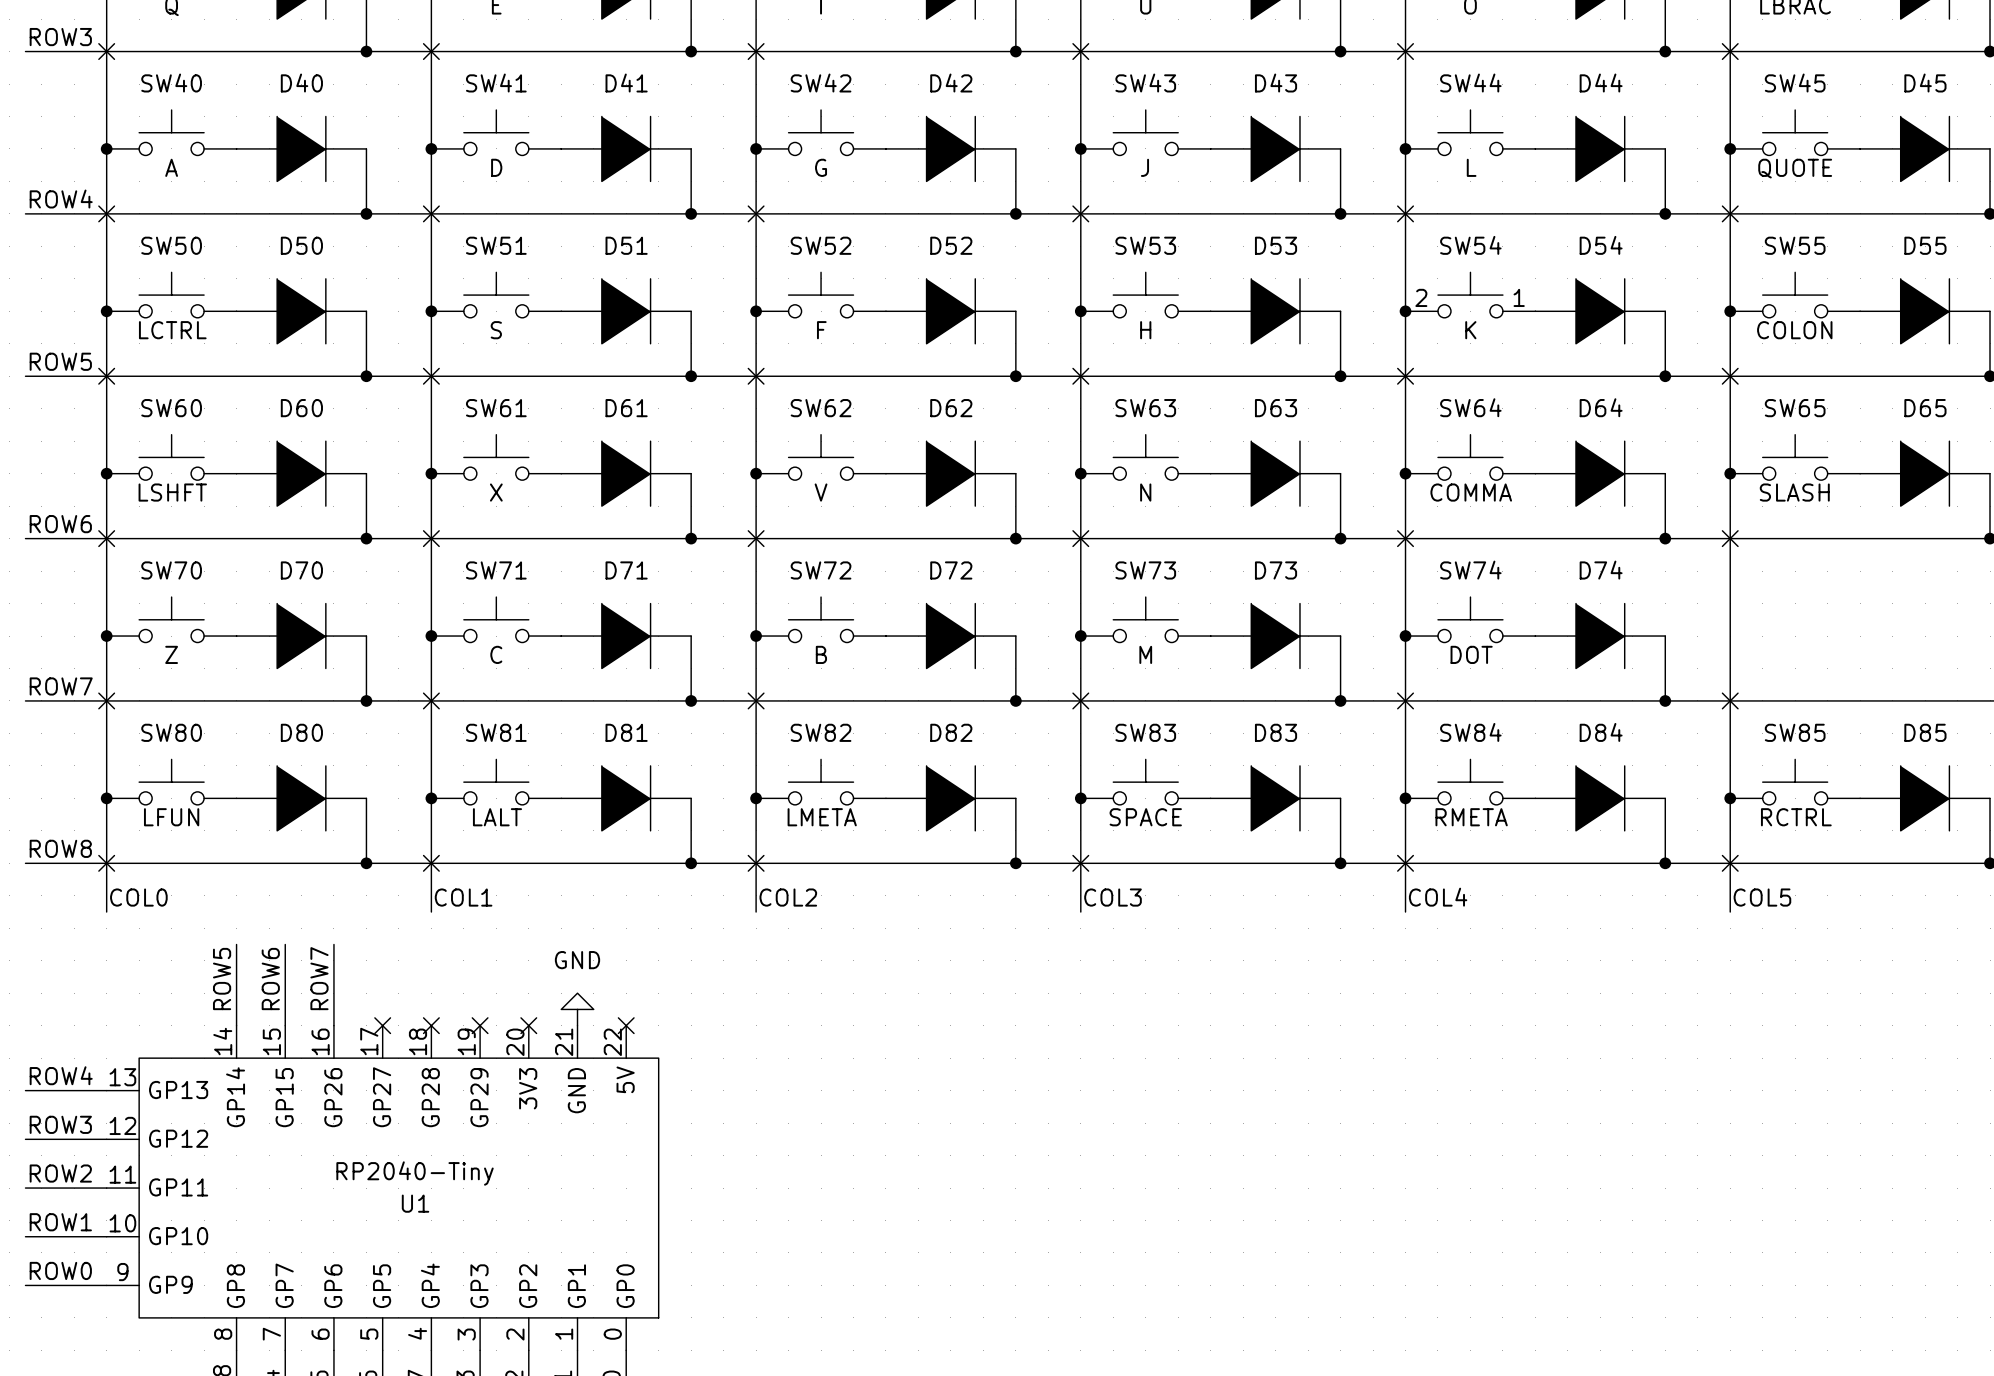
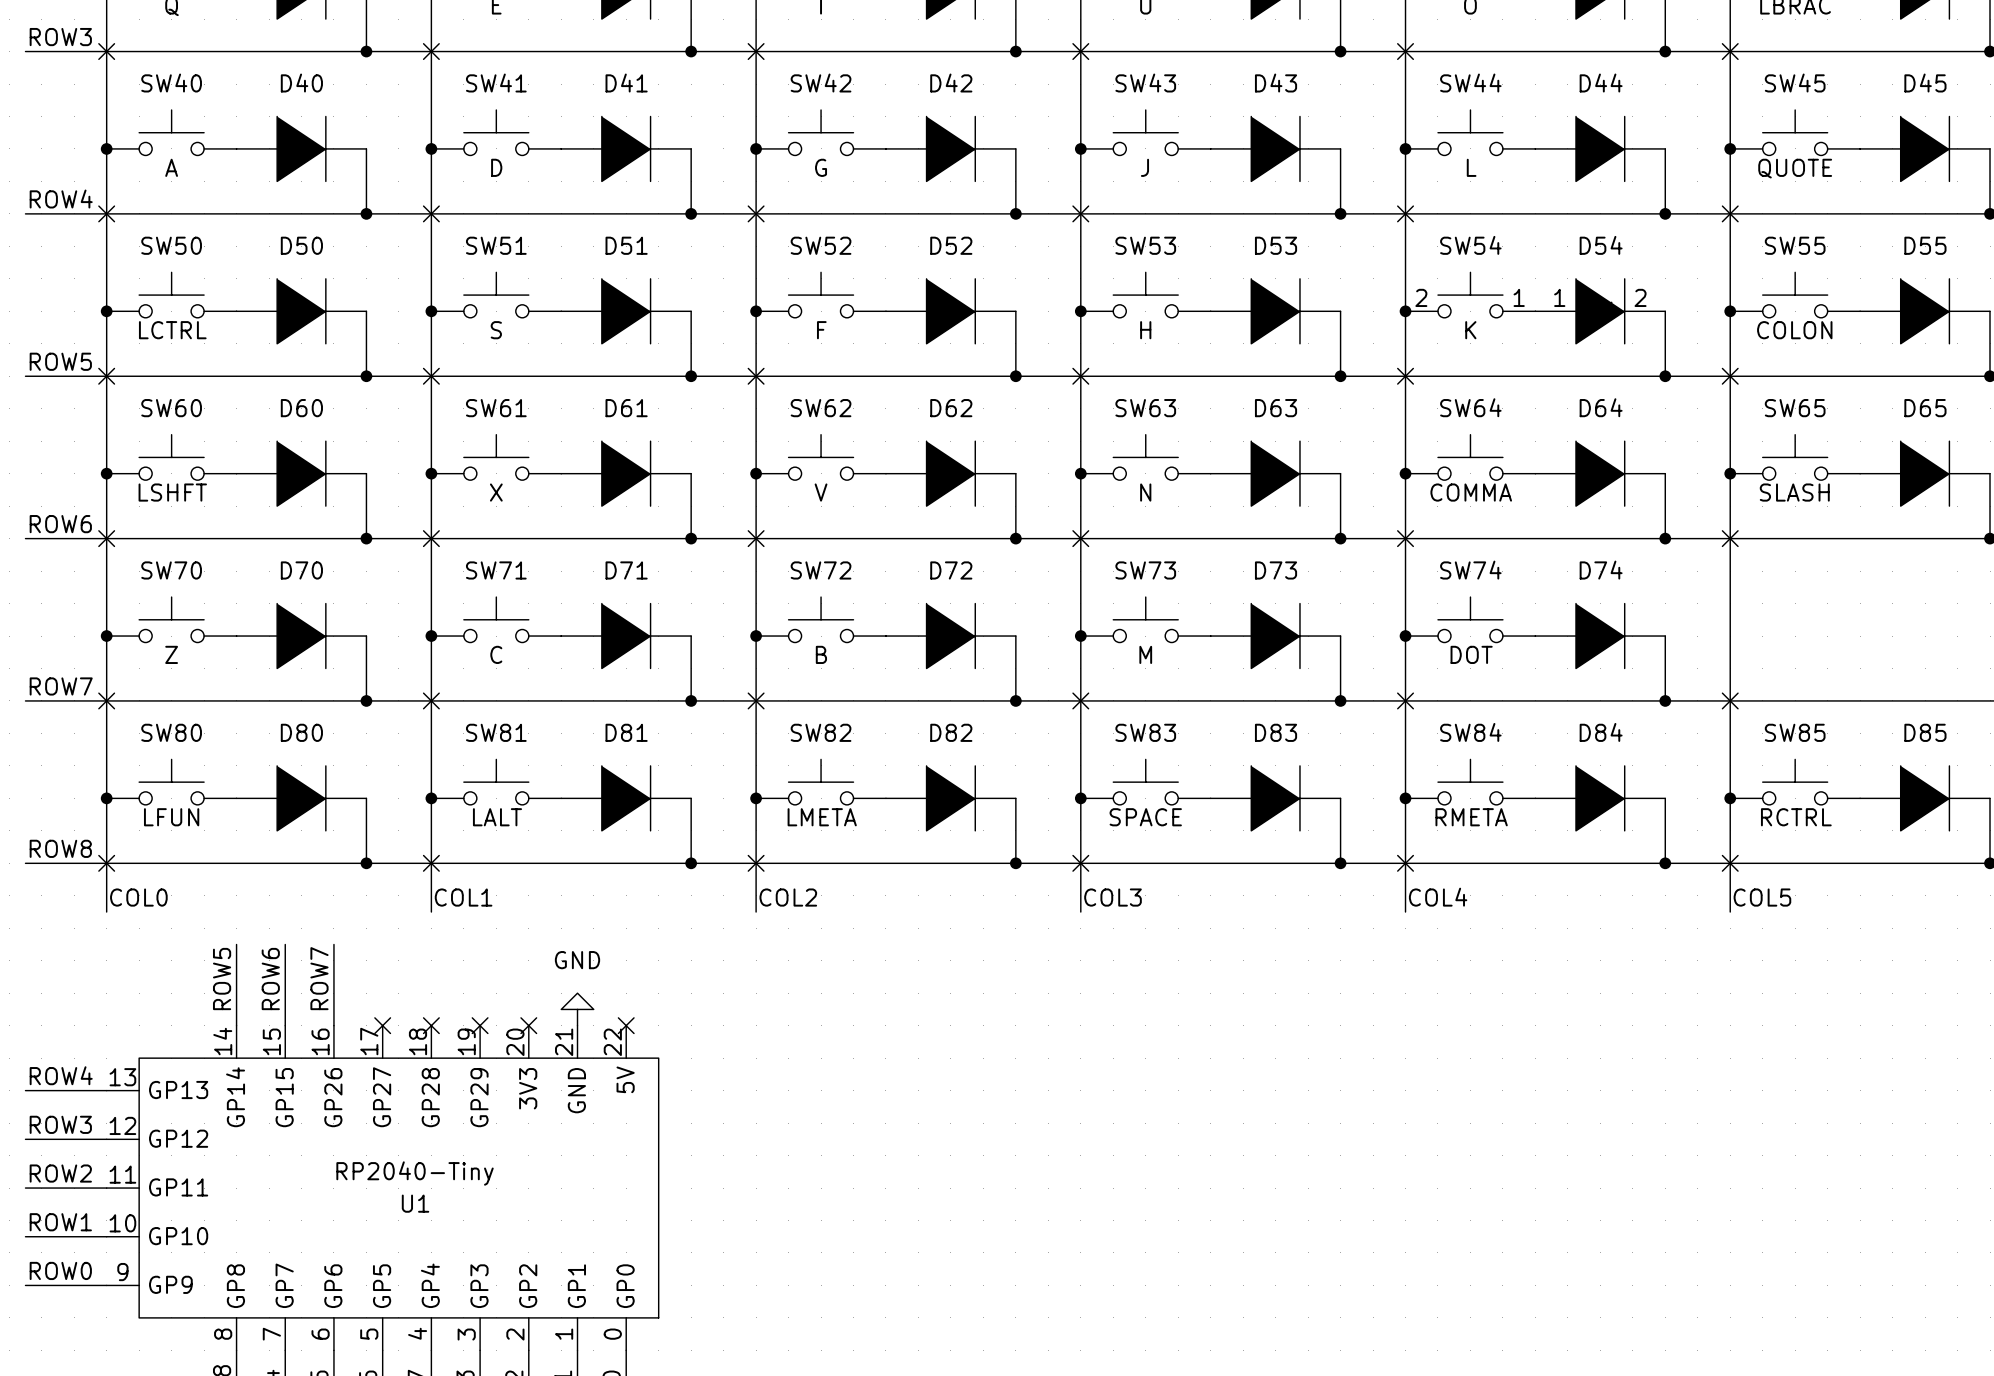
D54 pin number: none -> 1 (1559, 297)
D54 pin number: none -> 2 (1640, 297)

